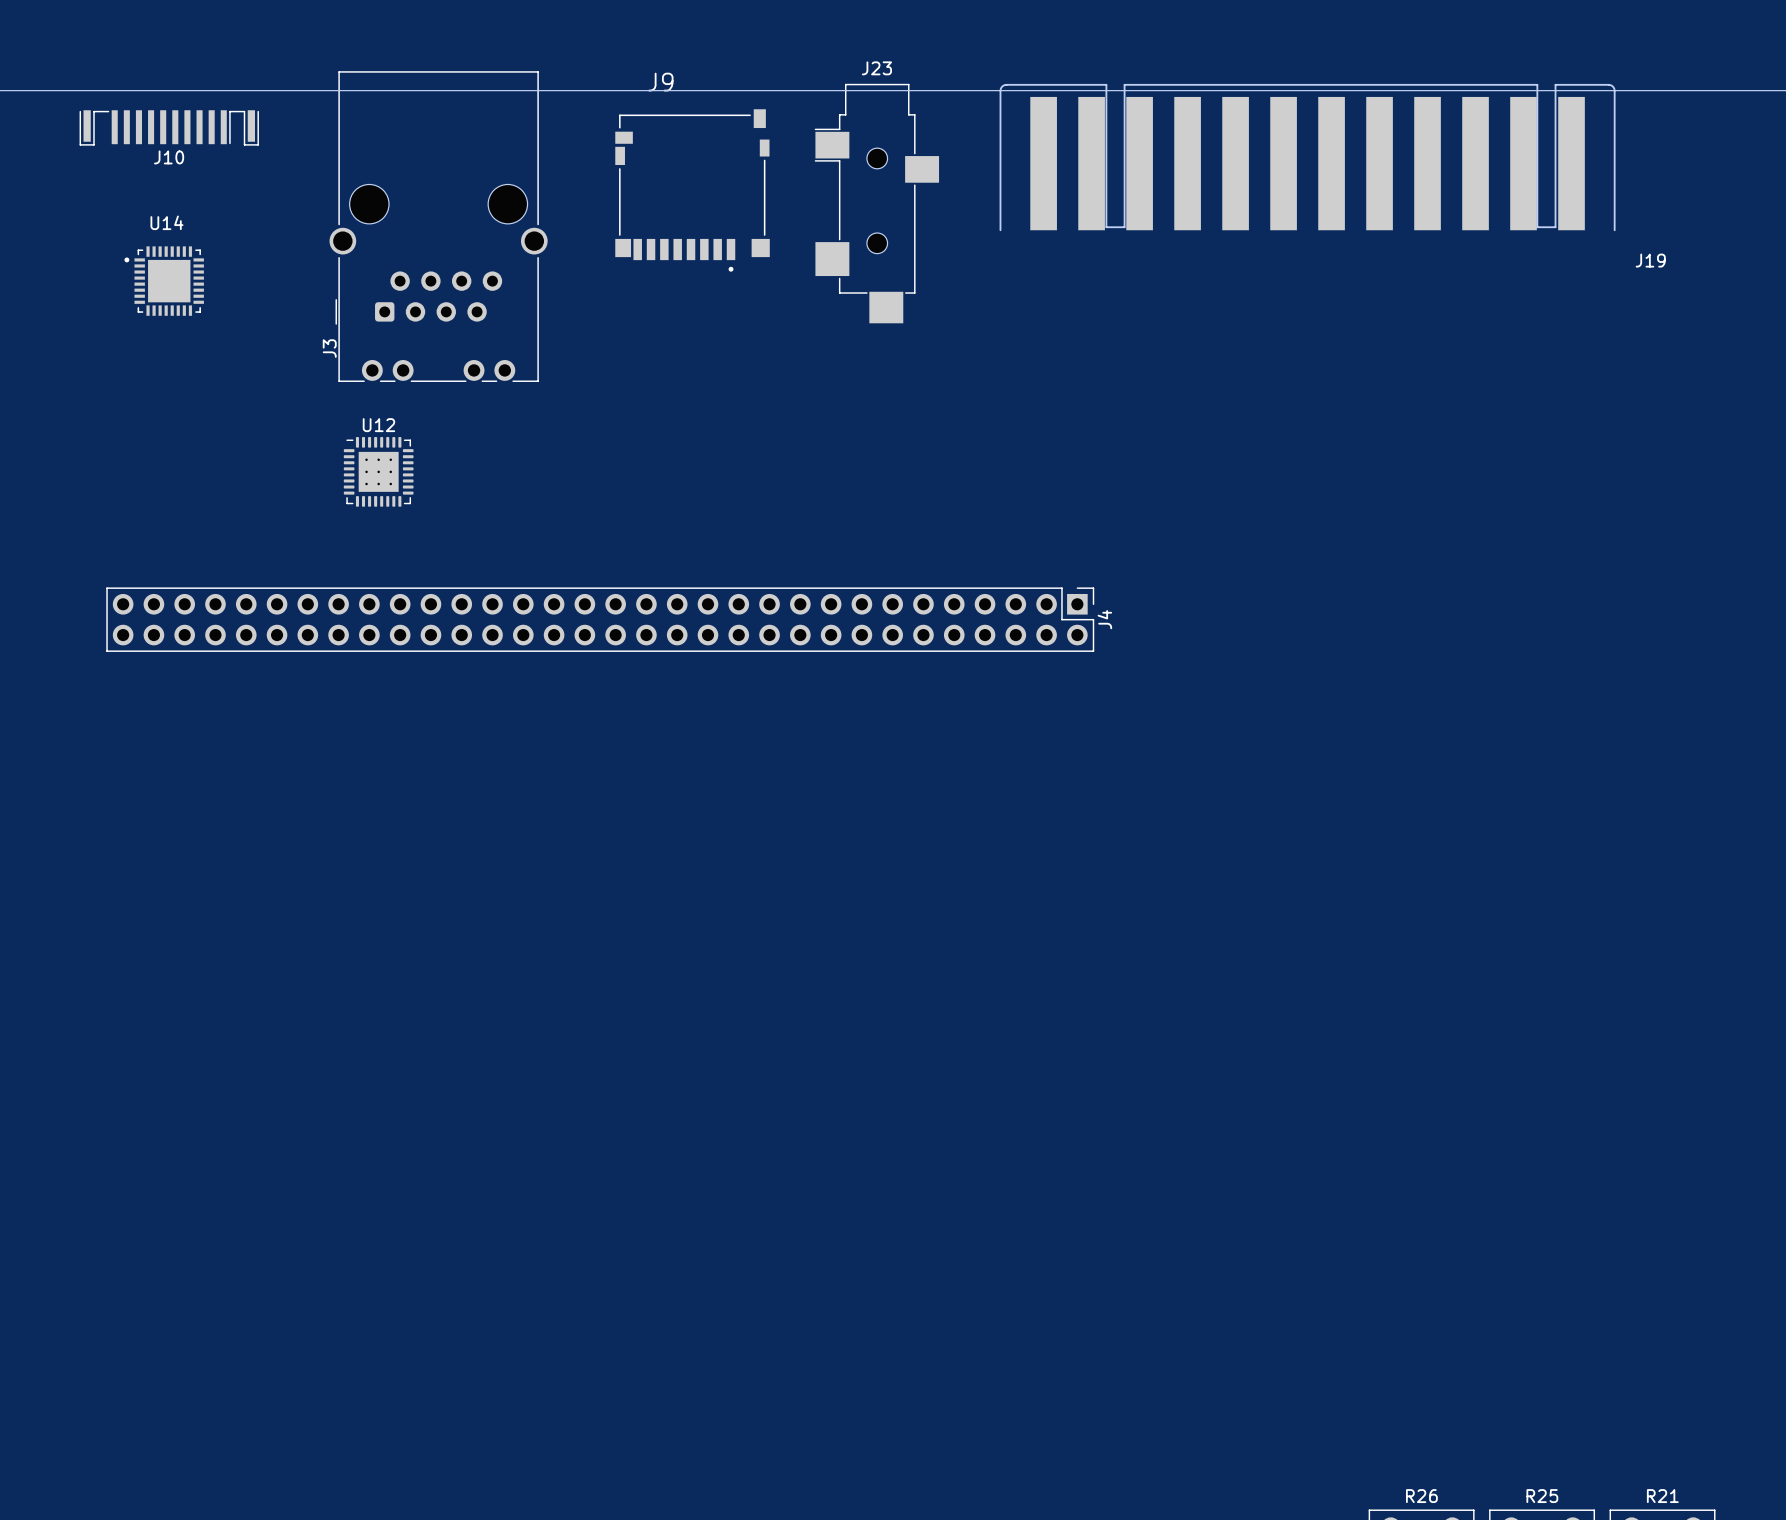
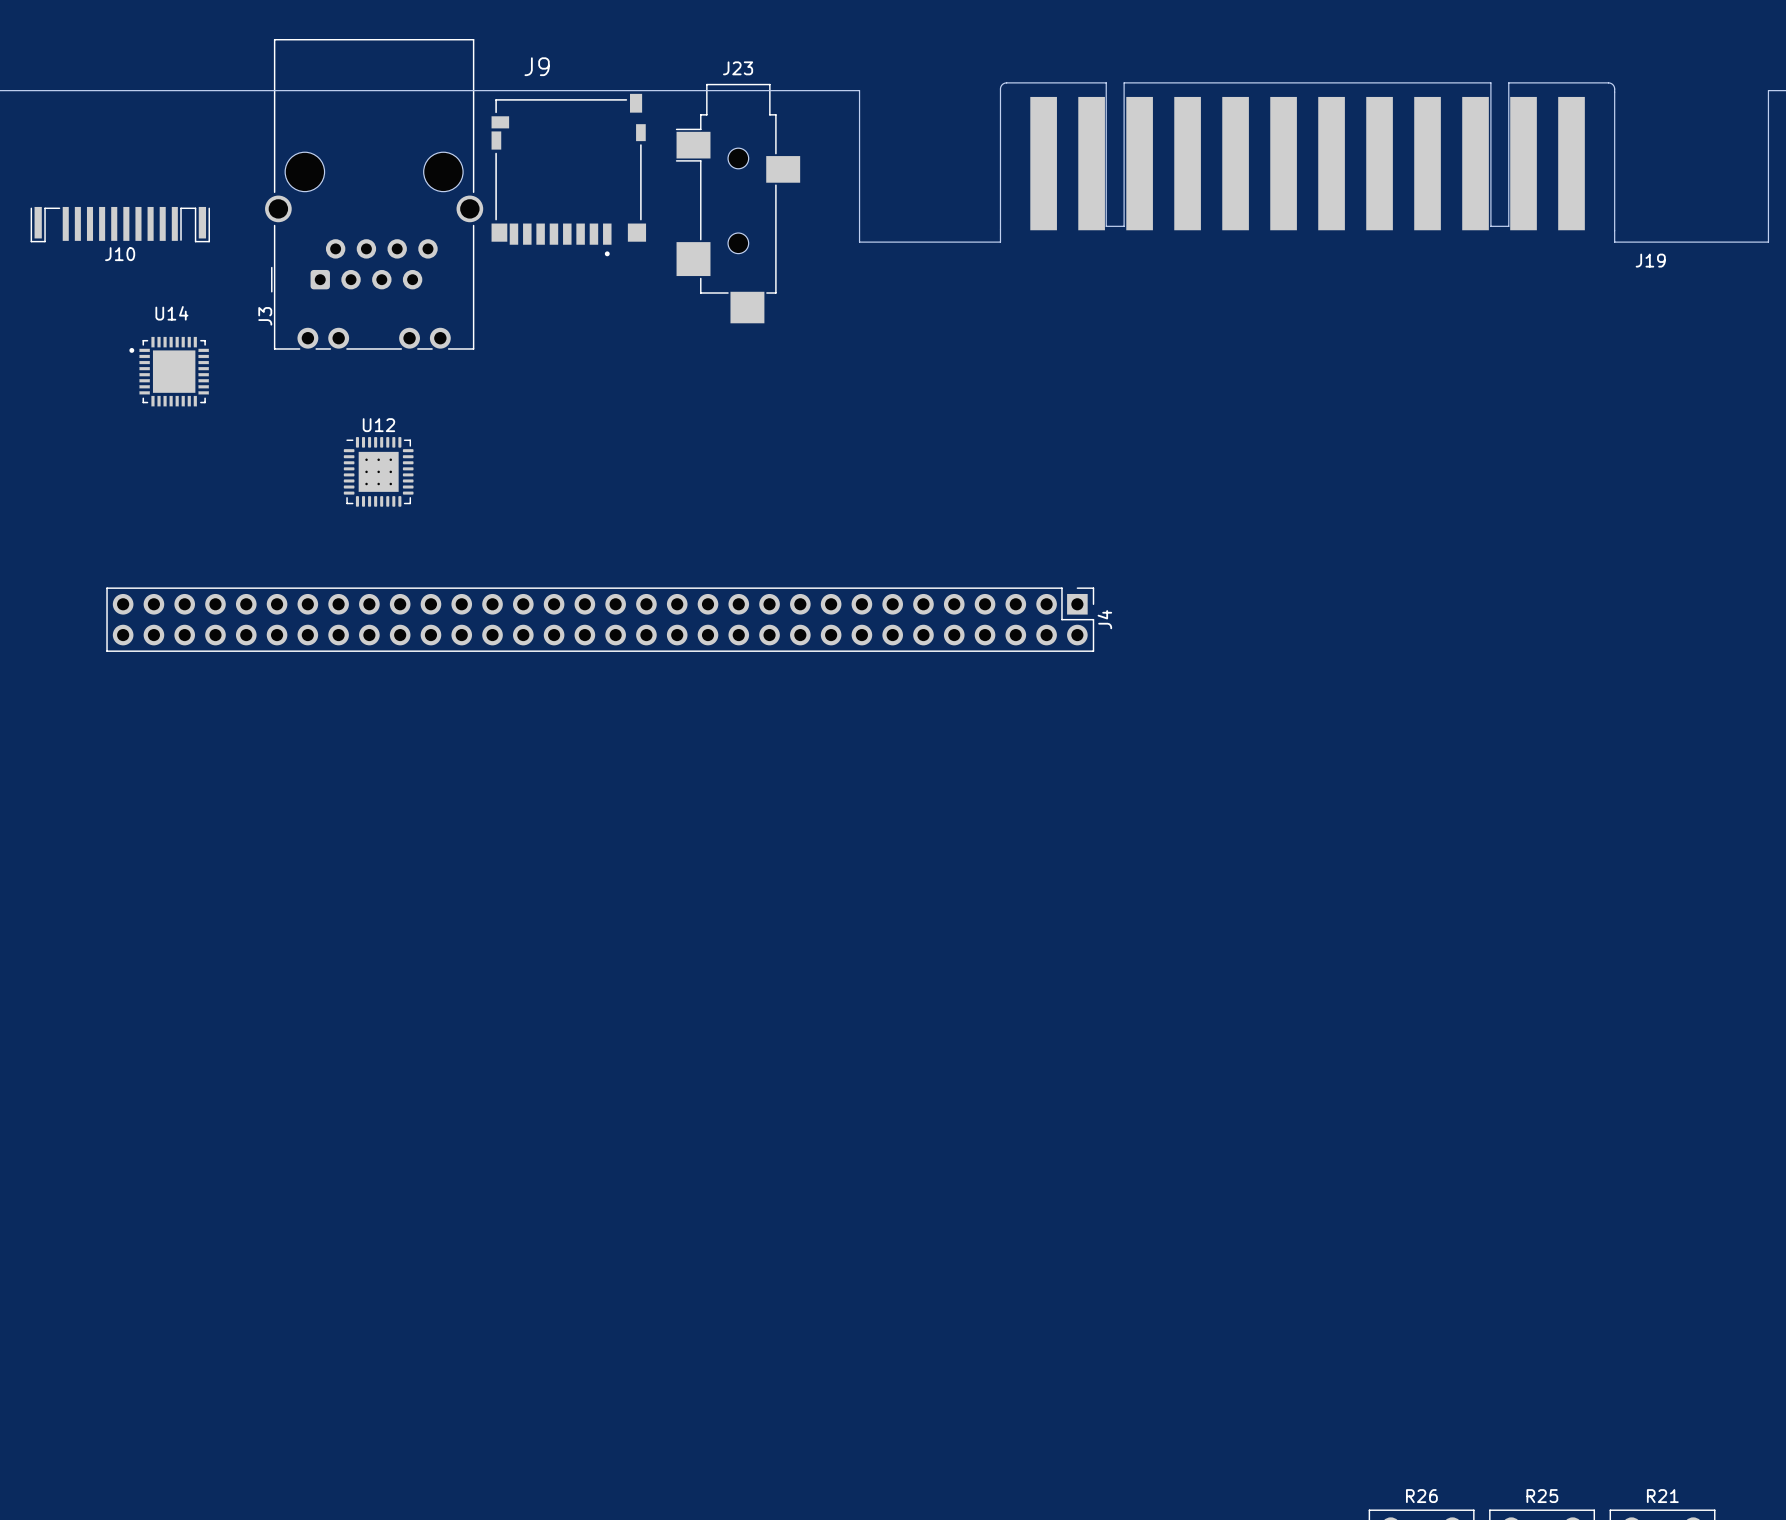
J19 footprint: [999, 83, 1616, 232] -> [1030, 96, 1585, 231]
board edge: (859, 90) (1768, 90) -> (859, 90) (859, 242) (1000, 242) (1000, 89) (1002, 84) (1006, 82) (1106, 82) (1106, 226) (1124, 226) (1124, 82) (1490, 82) (1490, 226) (1508, 226) (1508, 82) (1610, 83) (1614, 89) (1614, 242) (1768, 242) (1768, 90)
J10 position: (169, 127) -> (120, 224)
J9 position: (692, 190) -> (568, 175)
J23 position: (876, 203) -> (737, 203)
J3 position: (438, 226) -> (374, 194)
U14 position: (164, 281) -> (169, 371)

